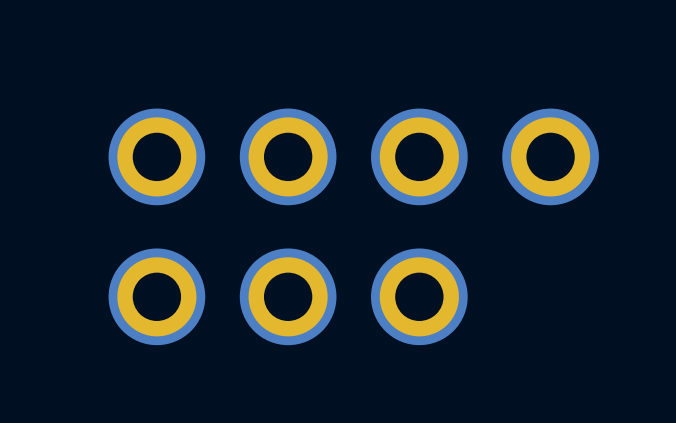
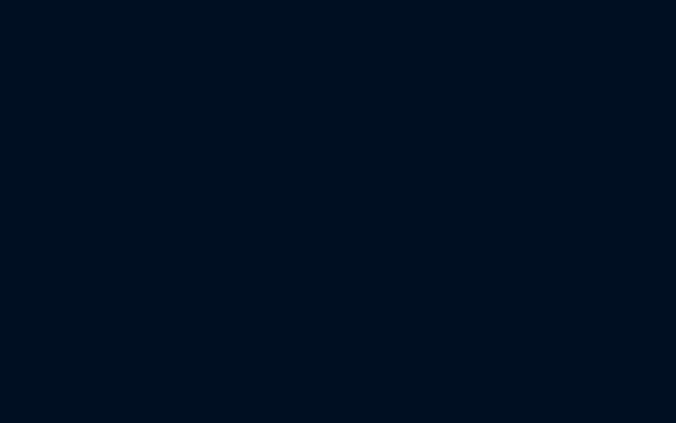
part: (156, 156) -> none
part: (288, 156) -> none
part: (419, 156) -> none
part: (550, 156) -> none
part: (156, 296) -> none
part: (288, 296) -> none
part: (419, 296) -> none

